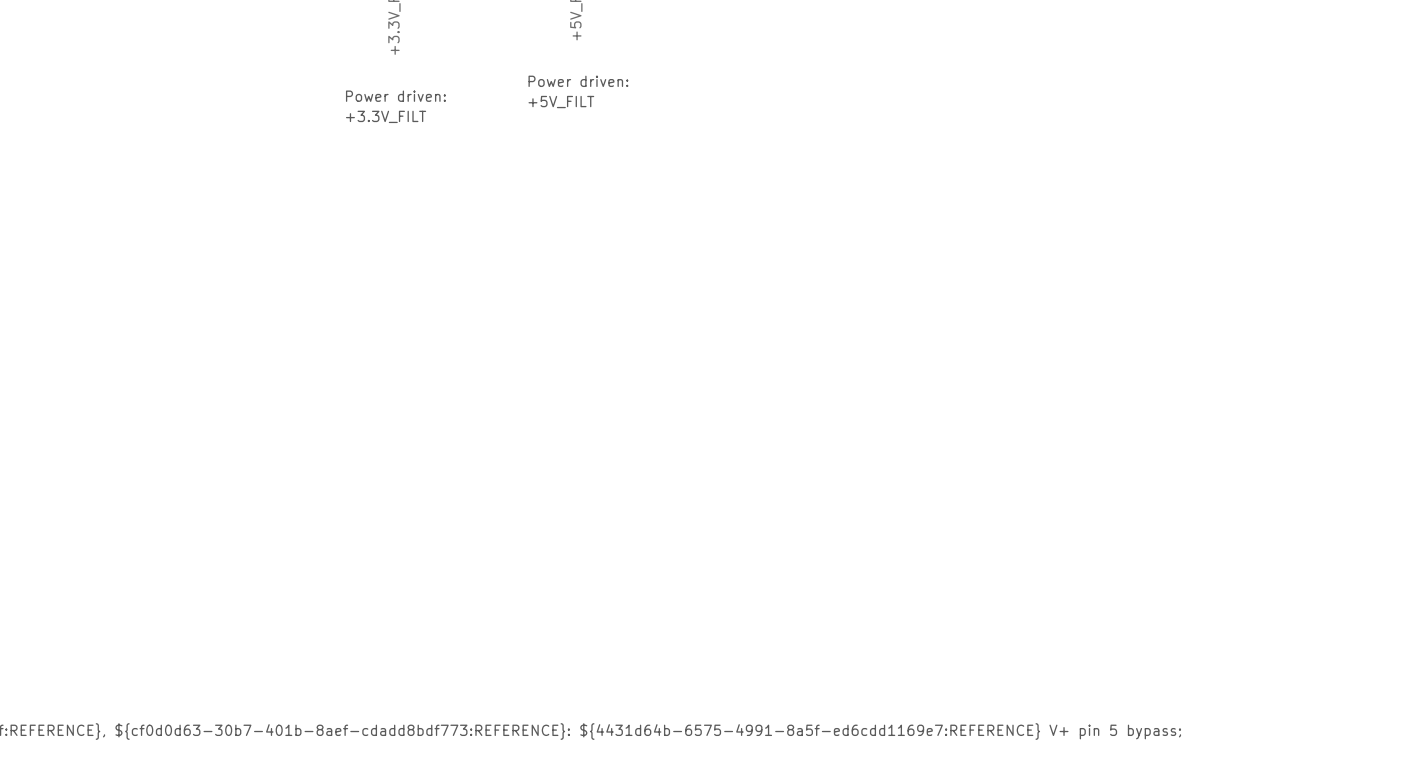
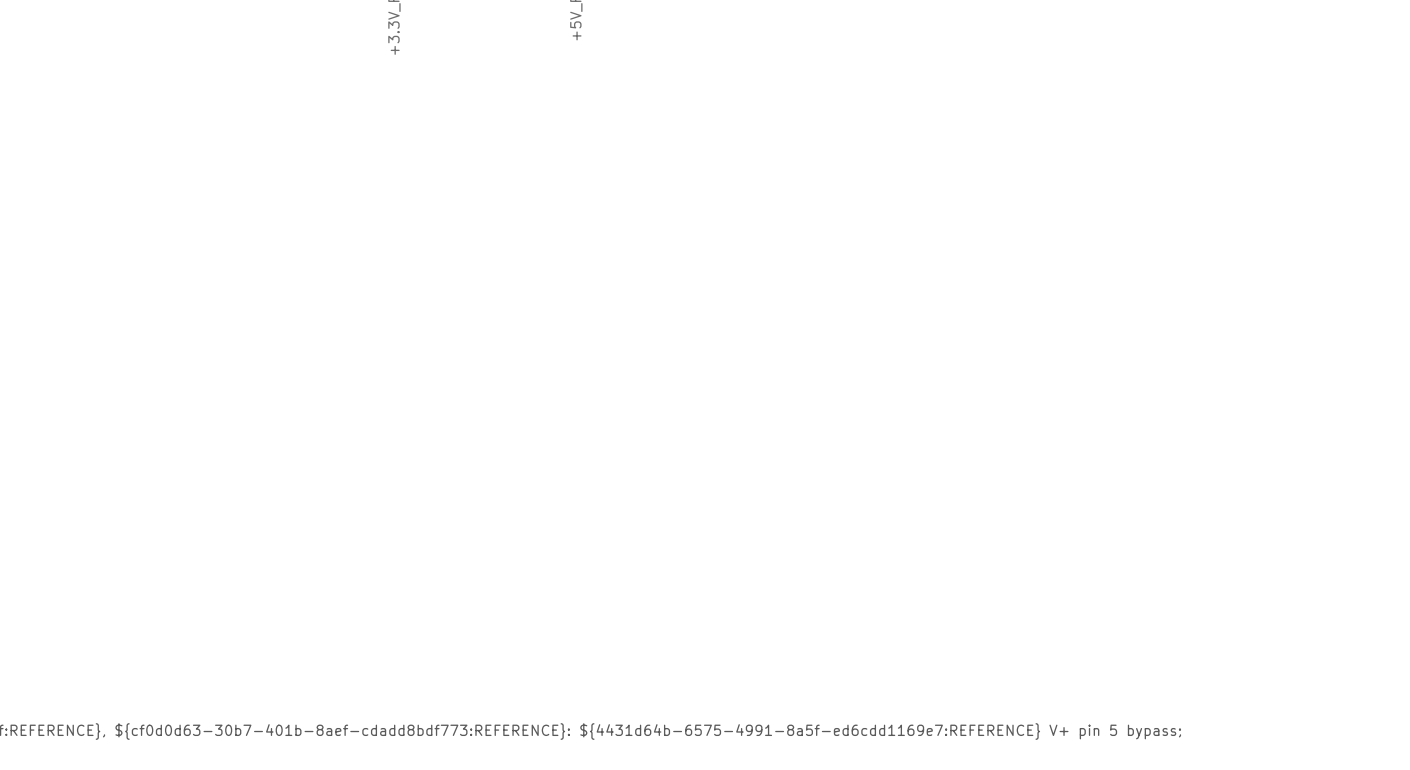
text: Power driven: (578, 81) -> none
text: Power driven: (395, 96) -> none
text: +5V_FILT (561, 102) -> none
text: +3.3V_FILT (386, 116) -> none

